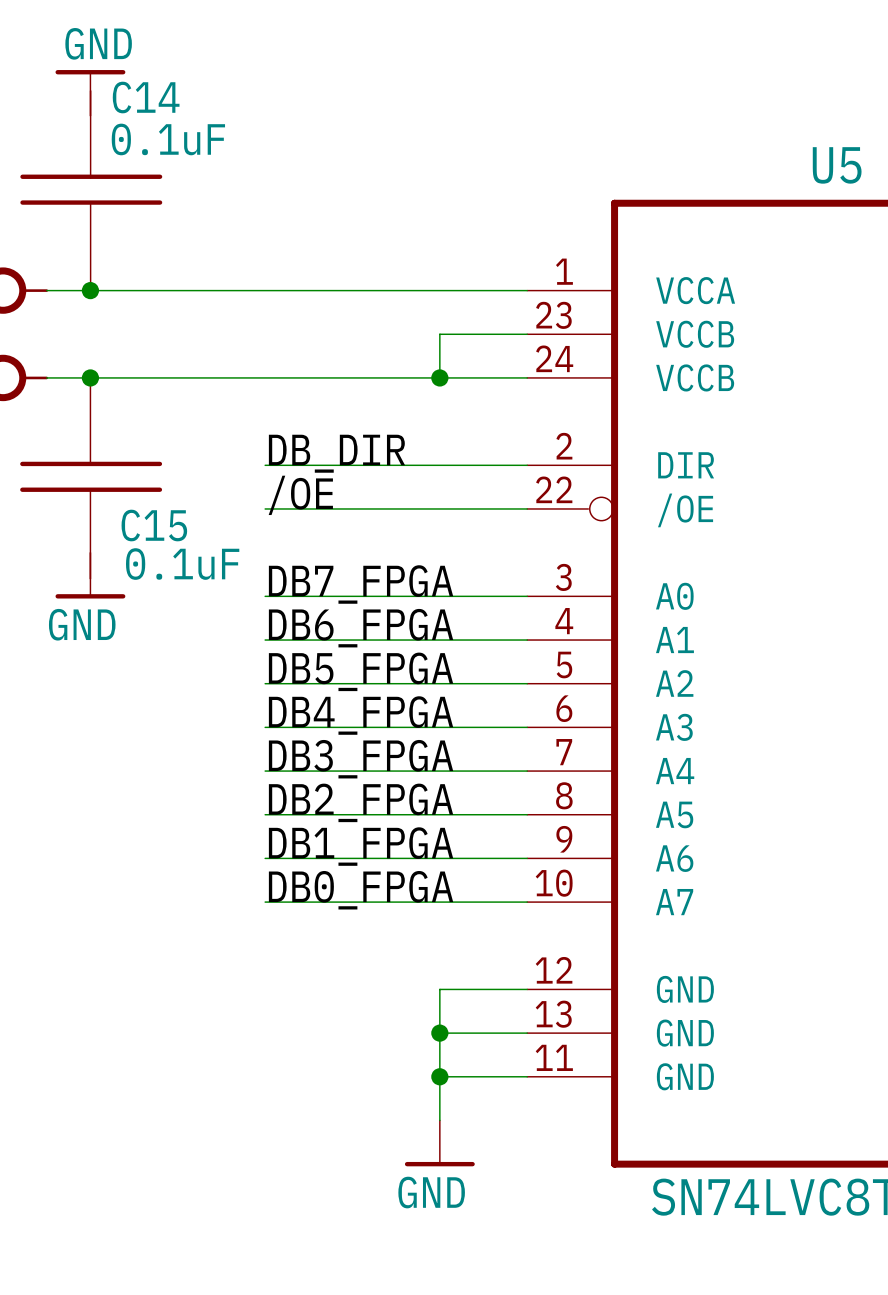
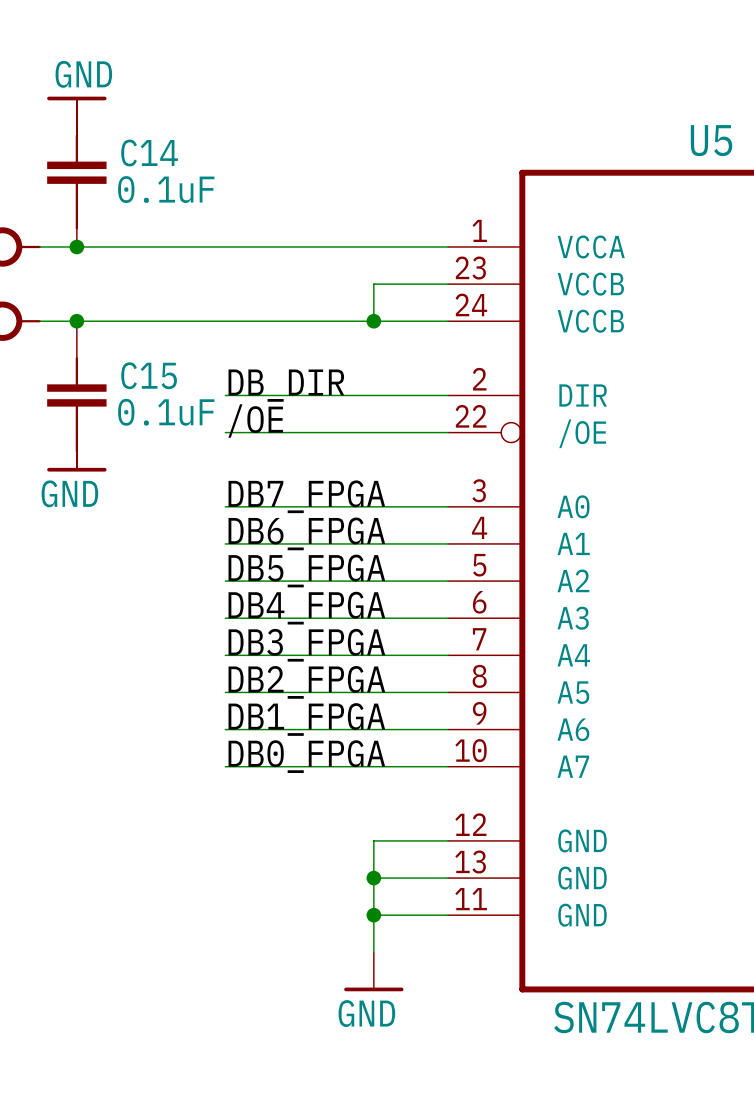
C14 symbol: [20, 90, 163, 292] -> [47, 98, 107, 247]
power symbol position: GND (90, 92) -> GND (76, 116)
C14 name position: C14 (146, 97) -> C14 (149, 153)
C14 value position: 0.1uF (168, 139) -> 0.1uF (166, 189)
C15 symbol: [20, 377, 163, 579] -> [47, 321, 107, 470]
C15 name position: C15 (154, 525) -> C15 (149, 375)
C15 value position: 0.1uF (182, 564) -> 0.1uF (166, 412)
power symbol position: GND (90, 575) -> GND (76, 452)

